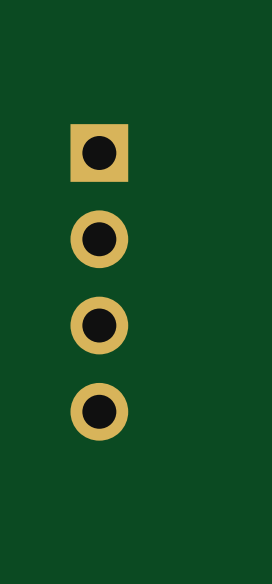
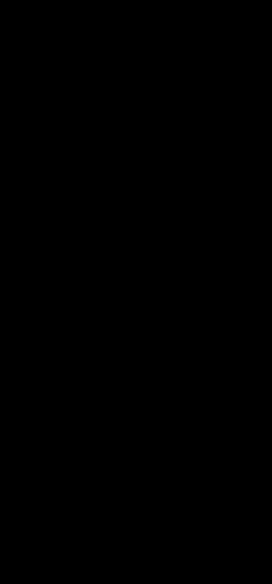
part: (99, 282) -> none

